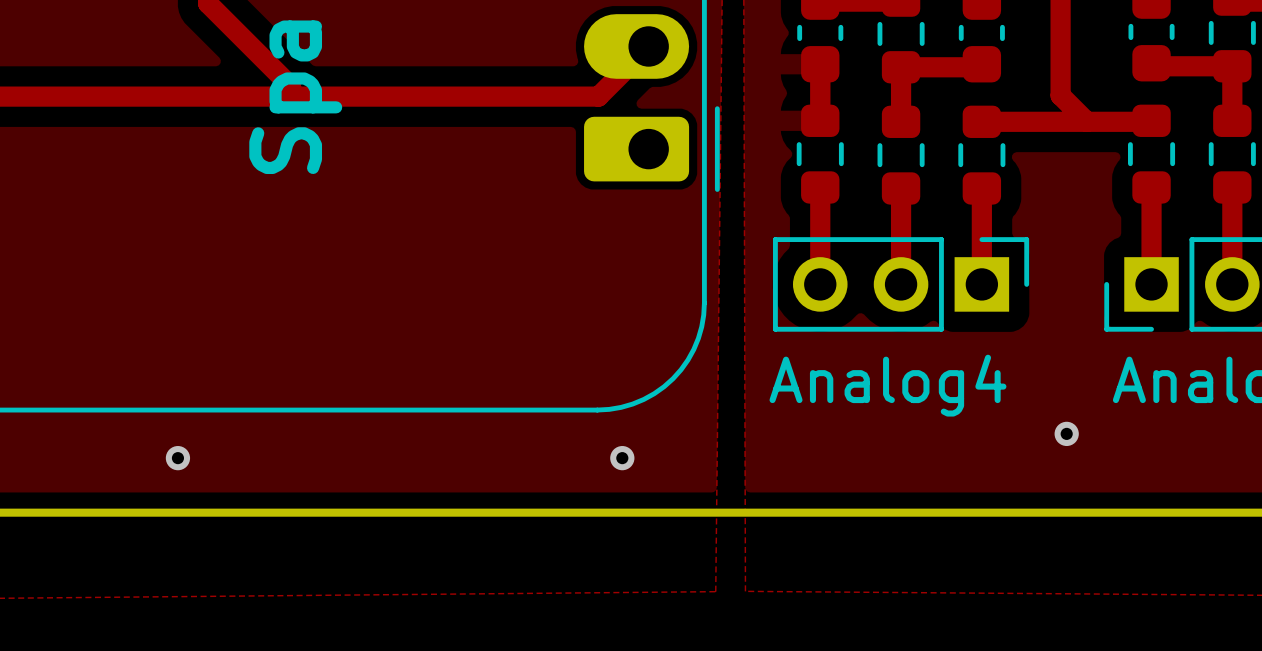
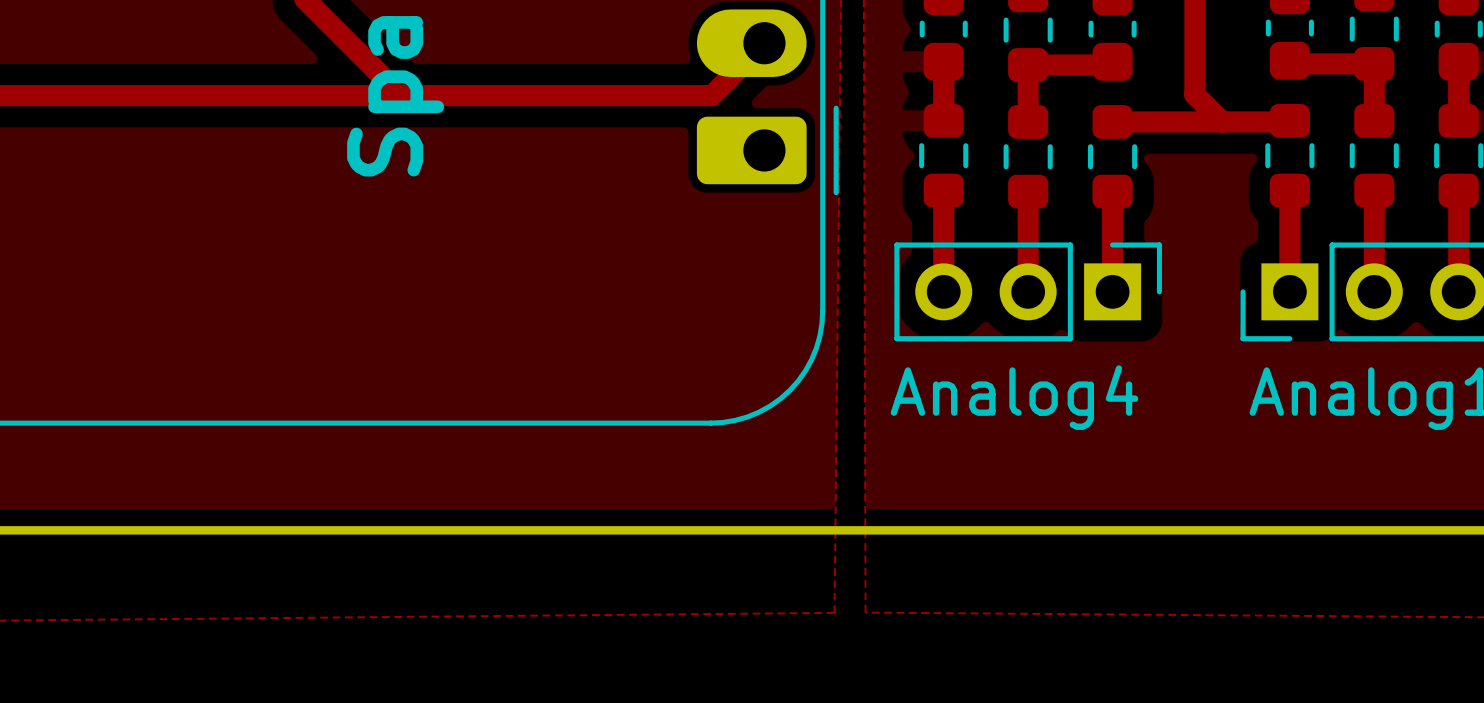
via: (1066, 433) -> none
via: (177, 458) -> none
via: (622, 458) -> none

